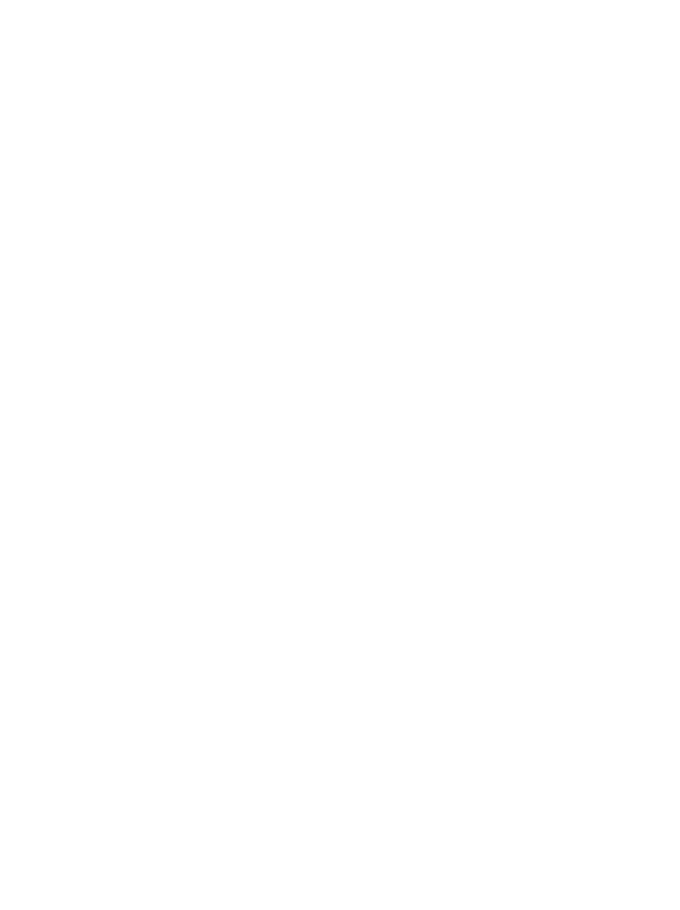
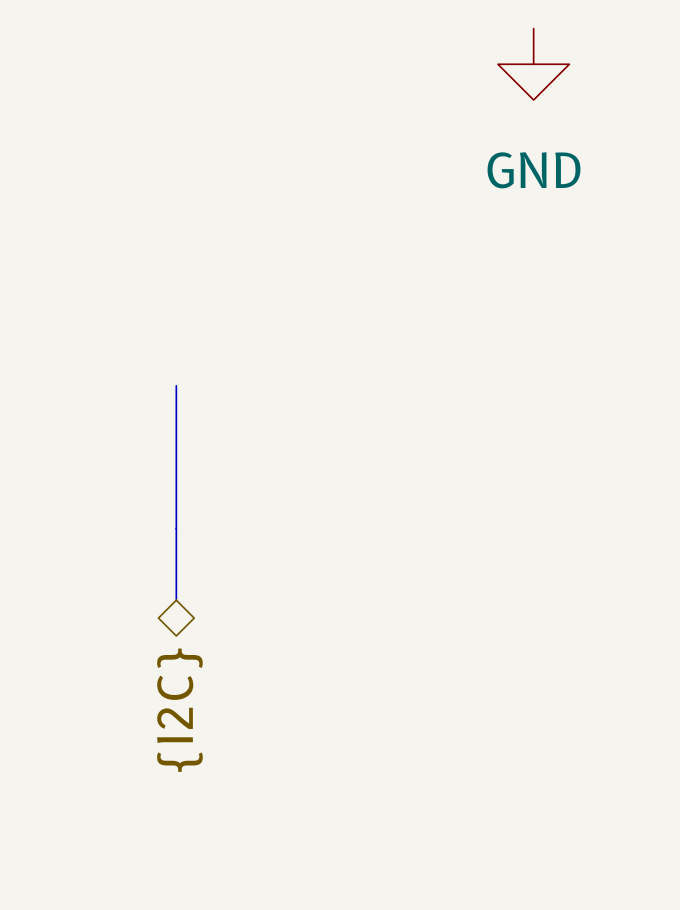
power symbol: none -> GND (533, 64)
bus: none -> (176, 385) (176, 600)
hierarchical label: none -> {I2C} (179, 710)

